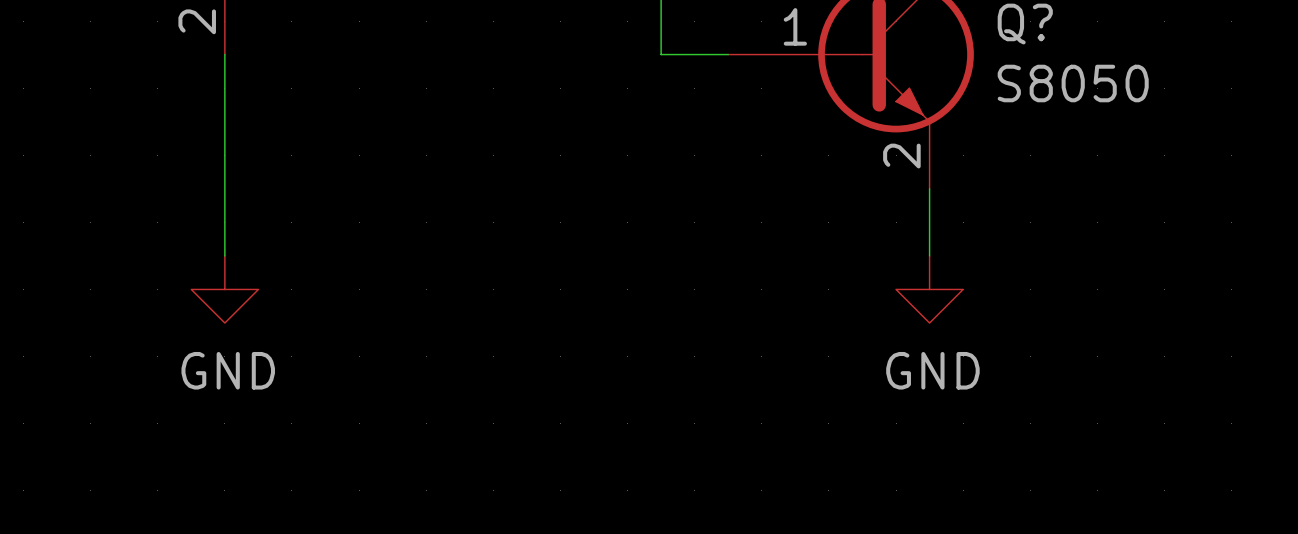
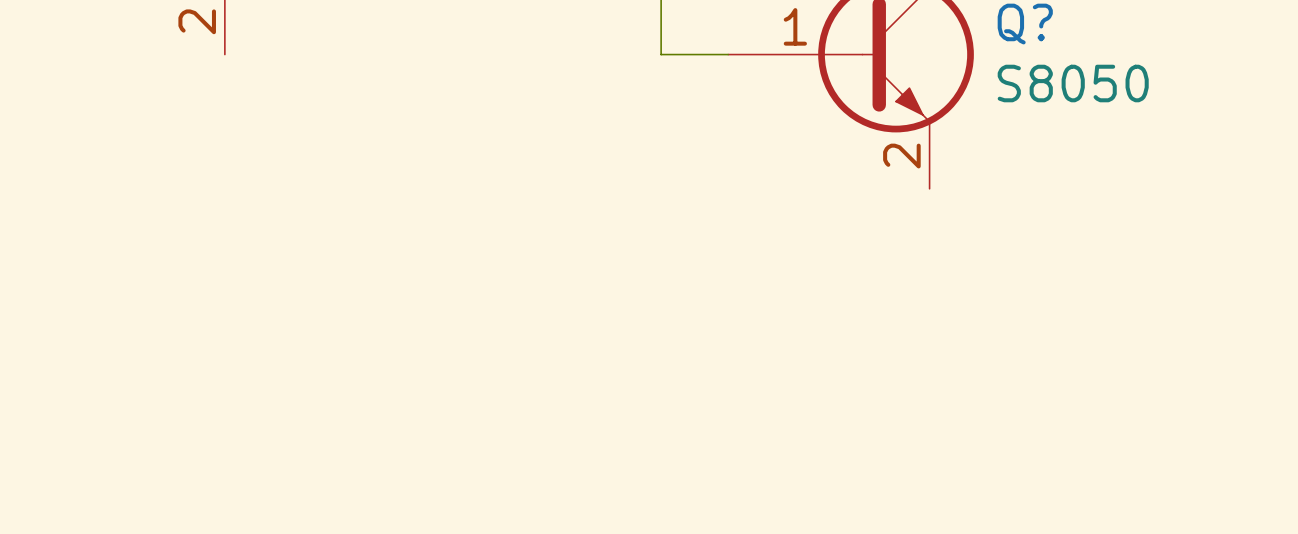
wire: (224, 54) (224, 255) -> none
wire: (929, 188) (929, 255) -> none
power symbol: GND (224, 289) -> none
power symbol: GND (929, 289) -> none

